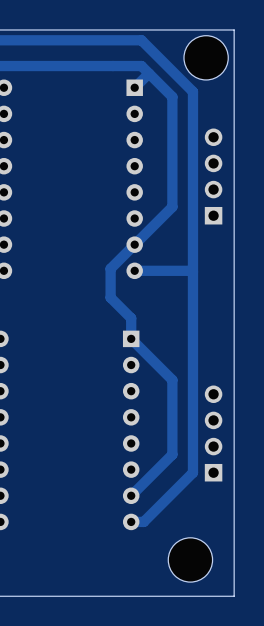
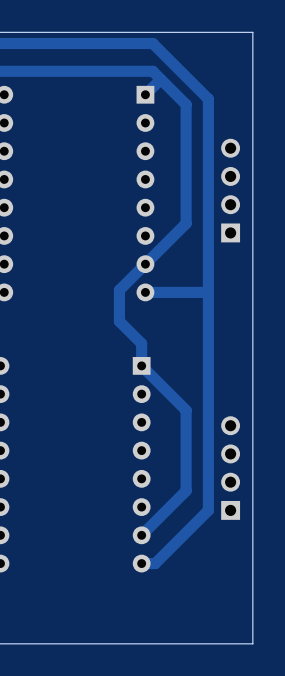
part: (206, 57) -> none
part: (190, 559) -> none

